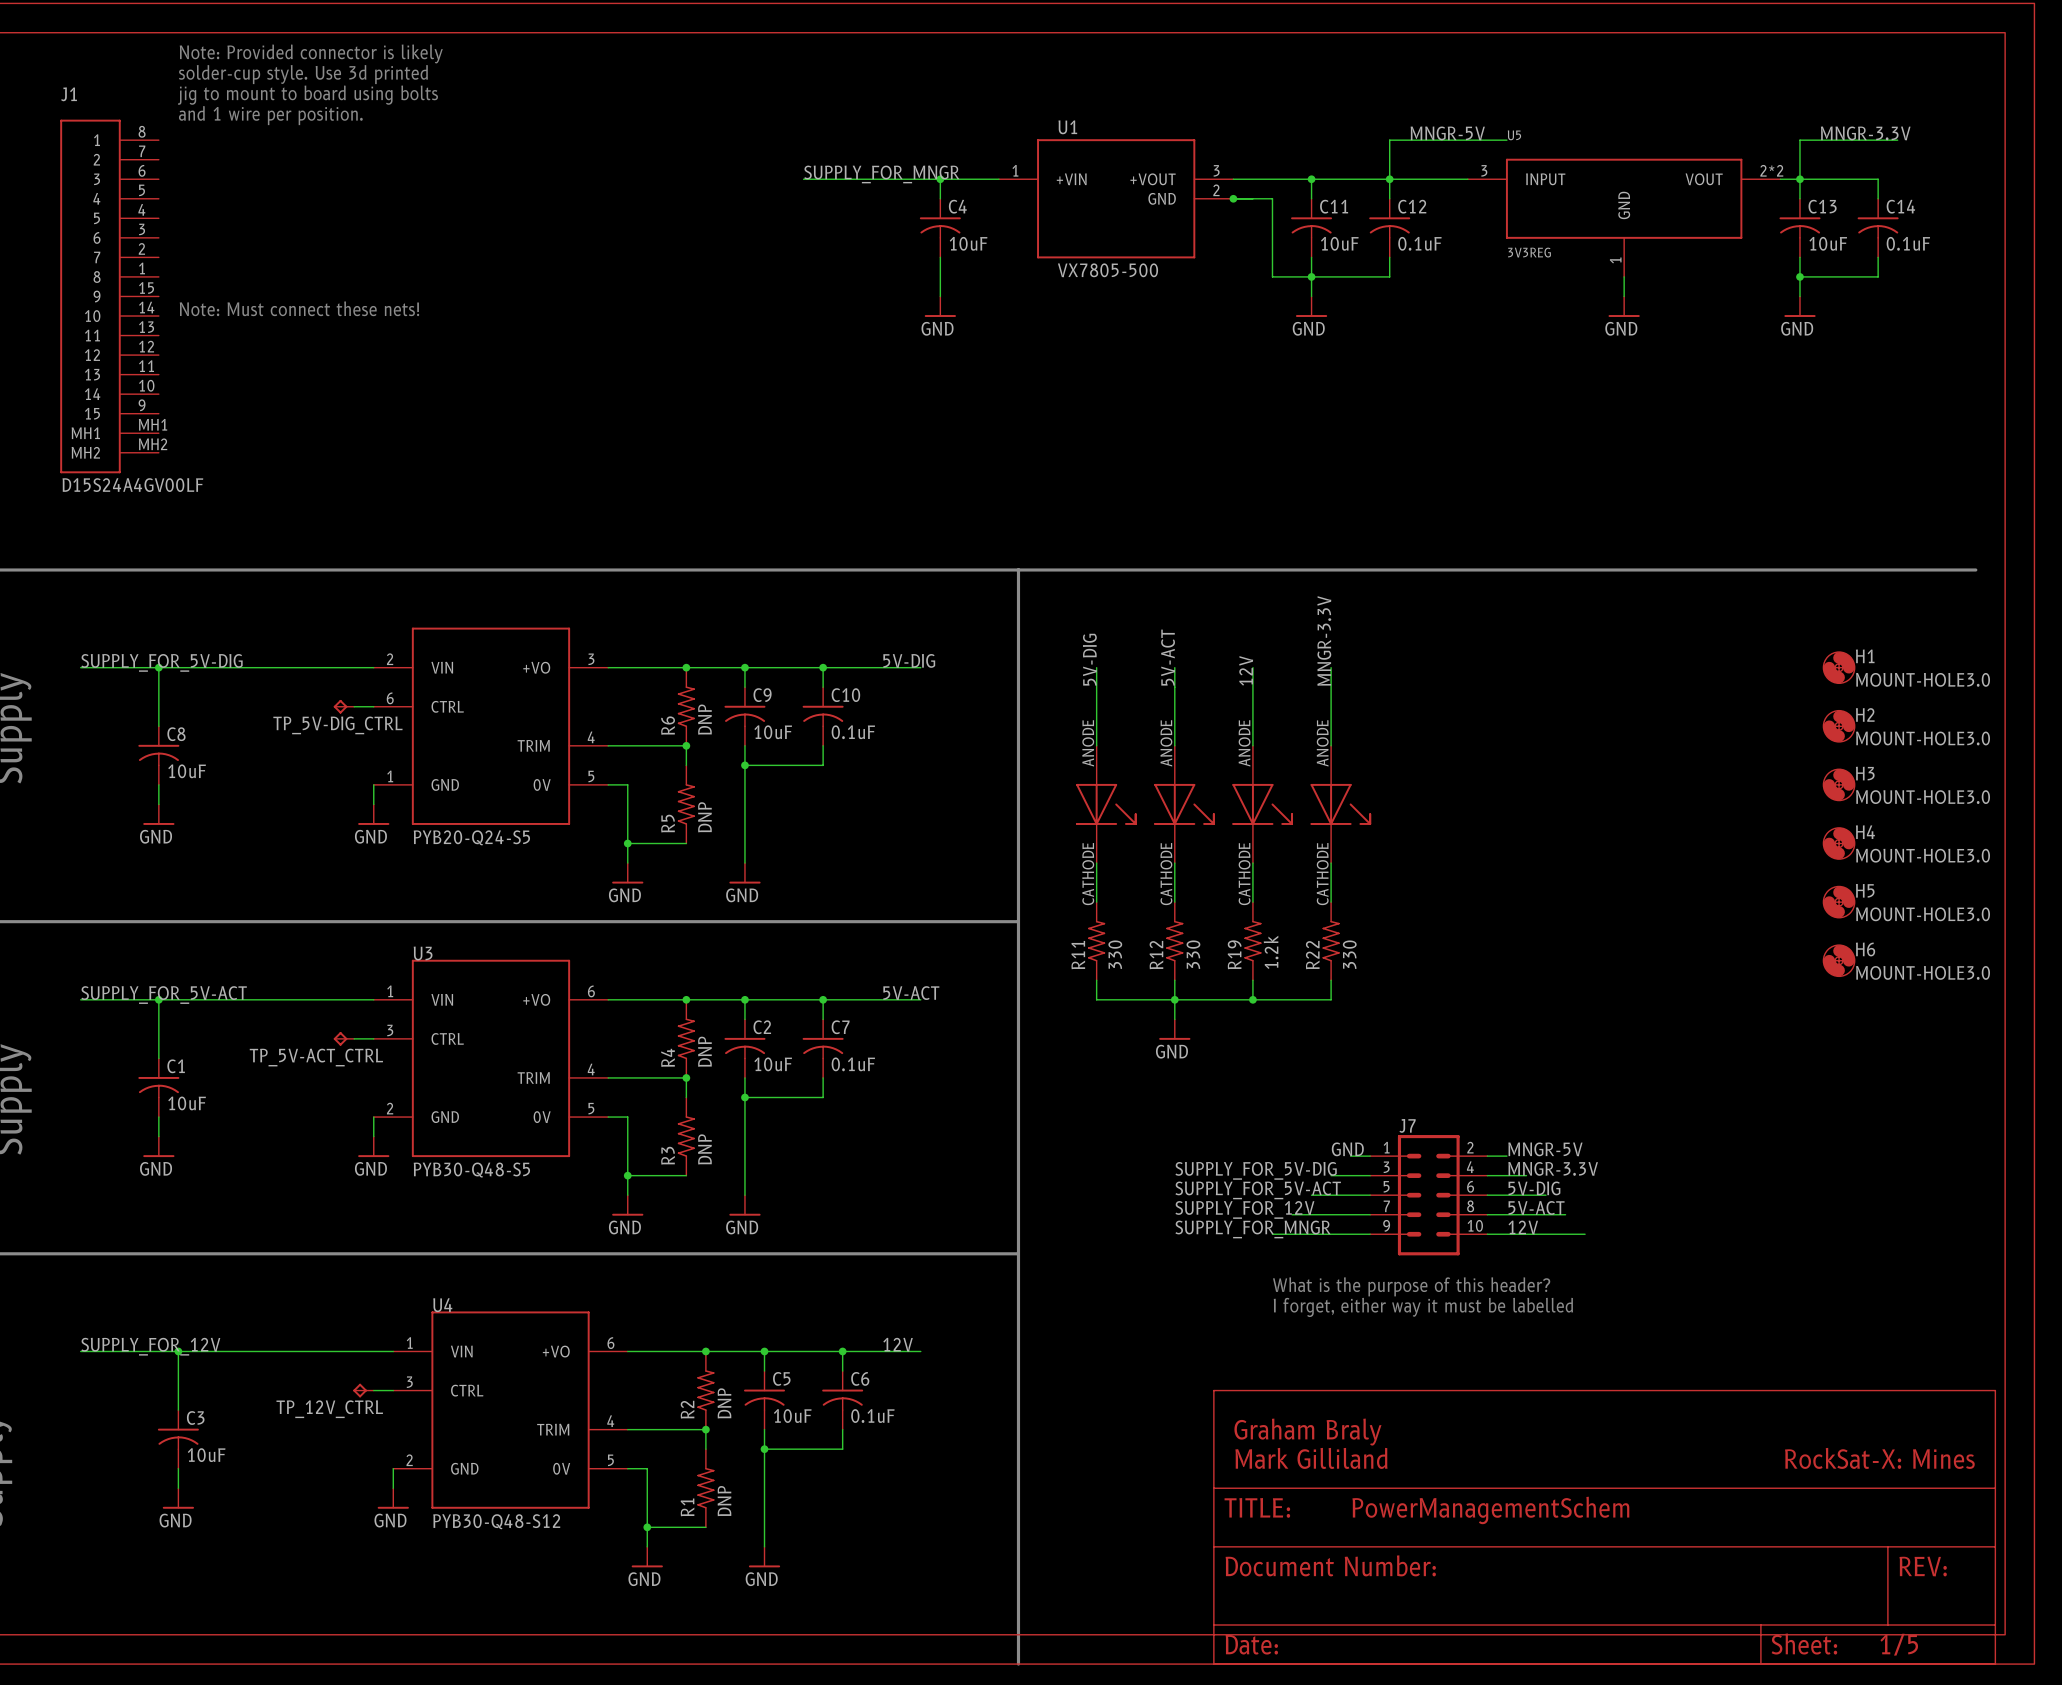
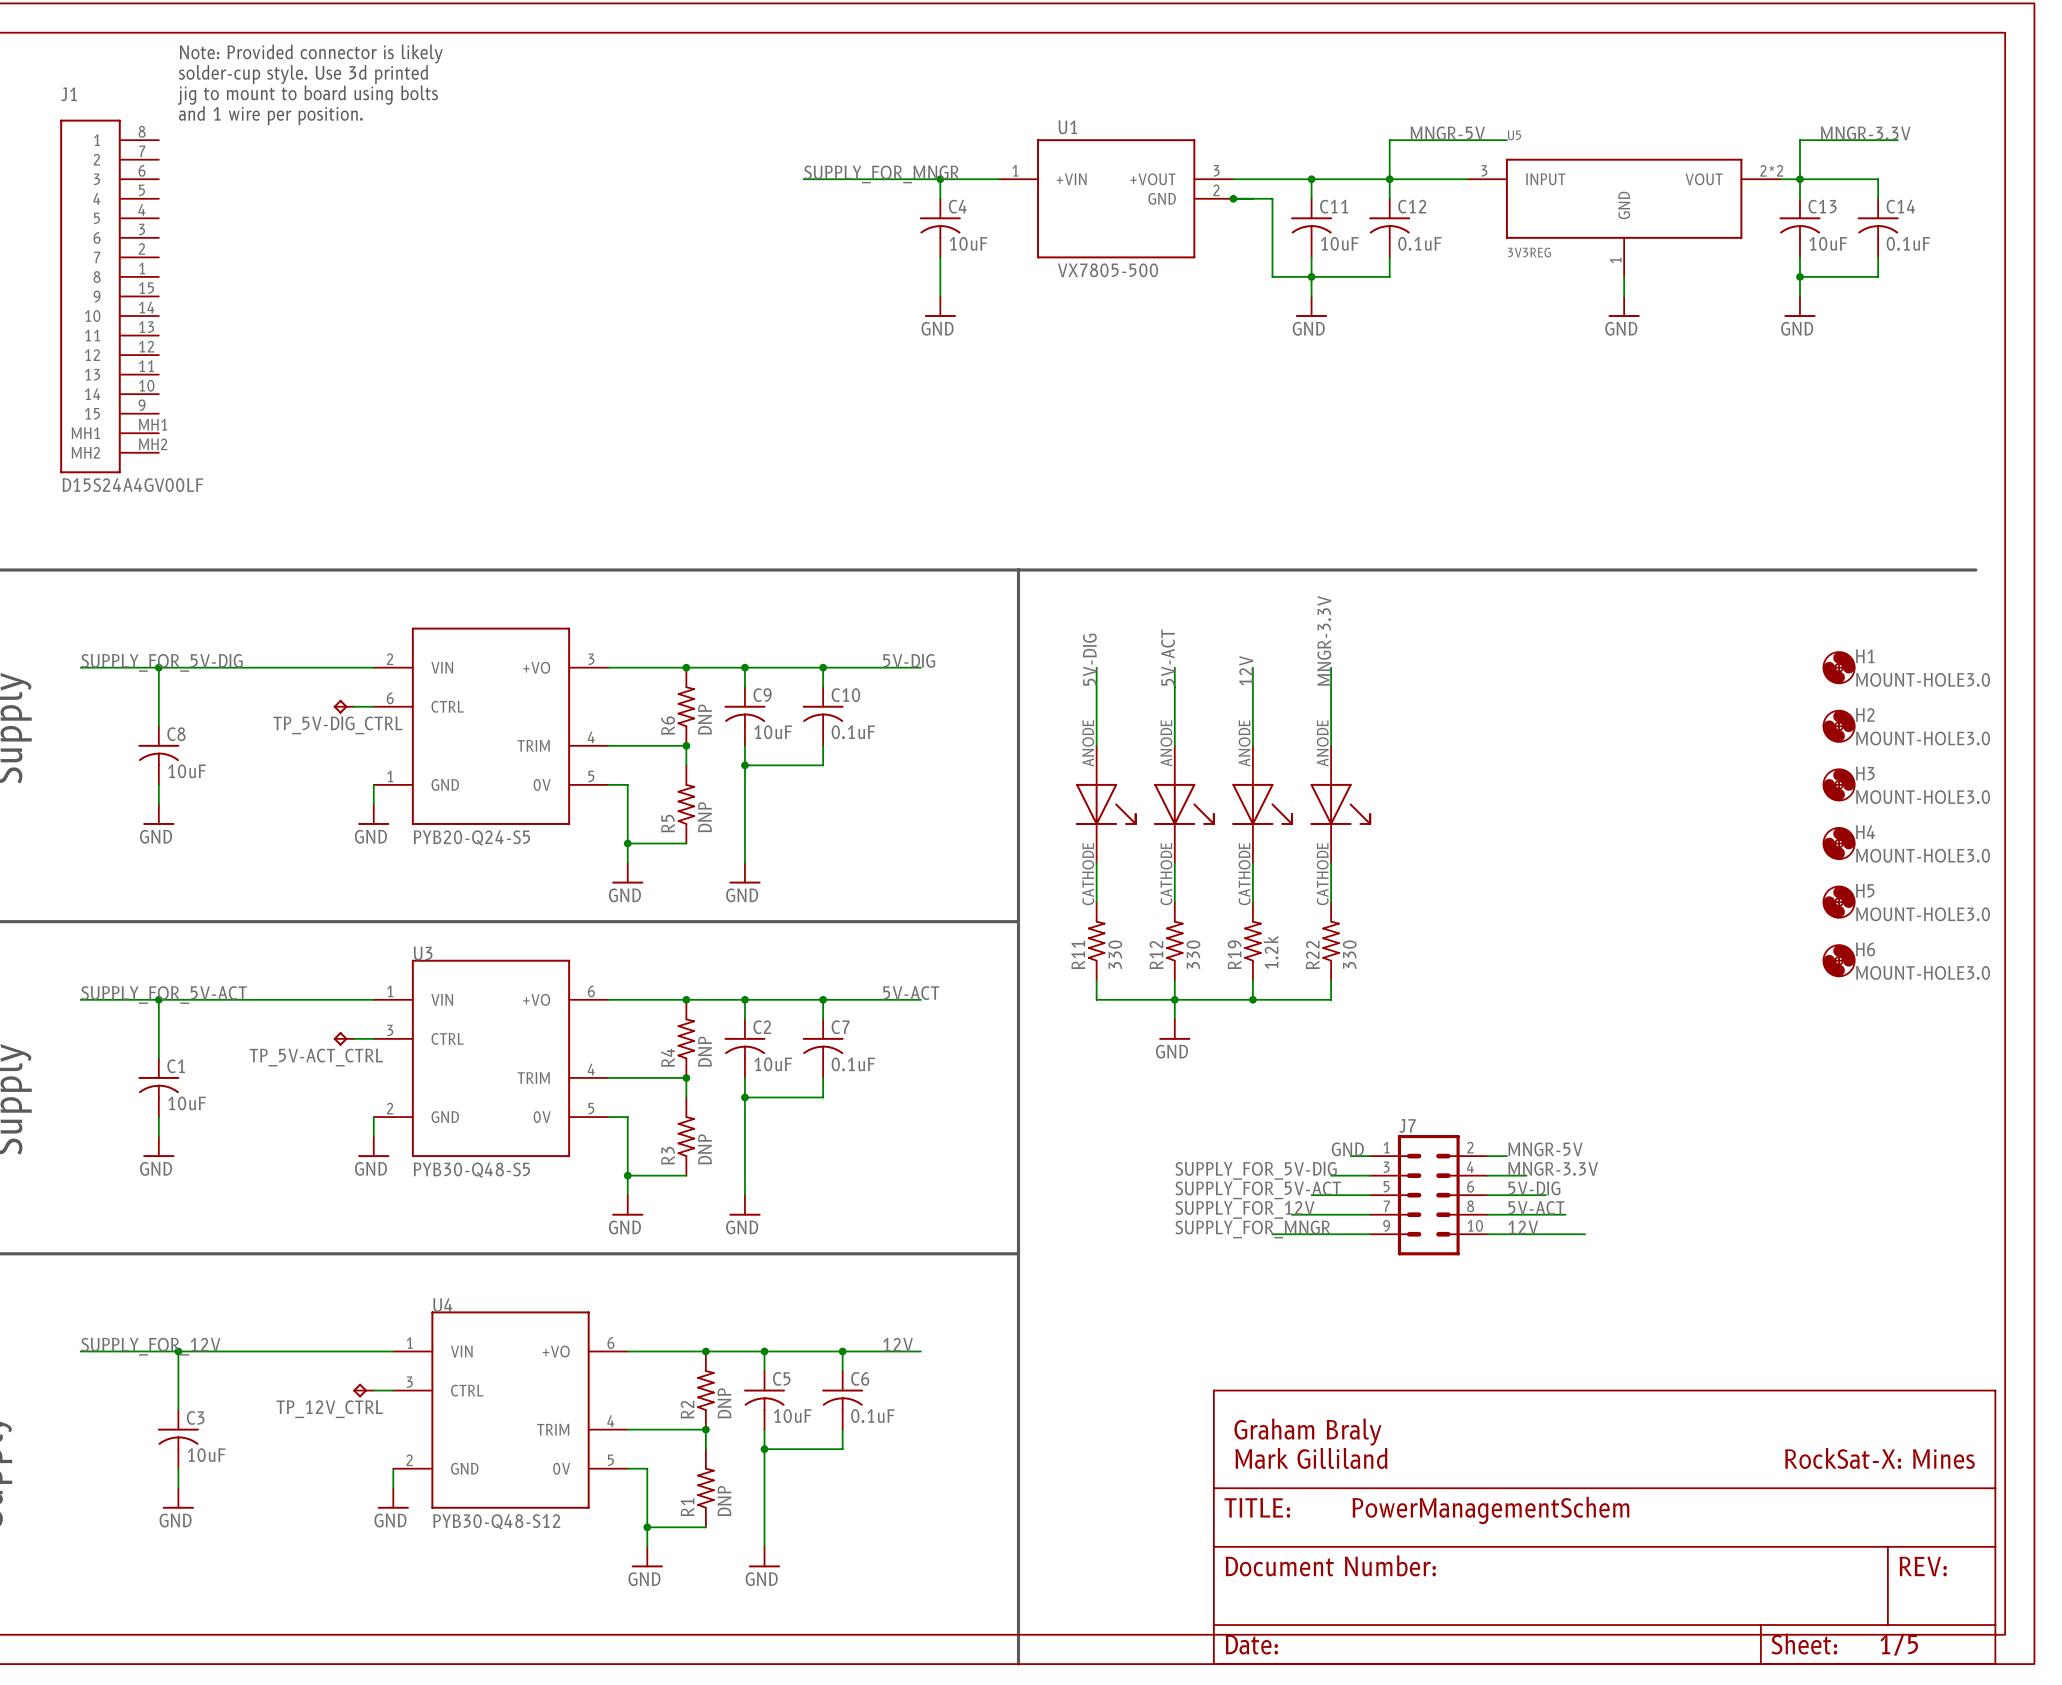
text: Note: Must connect these nets! (299, 308) -> none
text: What is the purpose of this header? (1411, 1286) -> none
text: I forget, either way it must be labelled (1423, 1307) -> none

